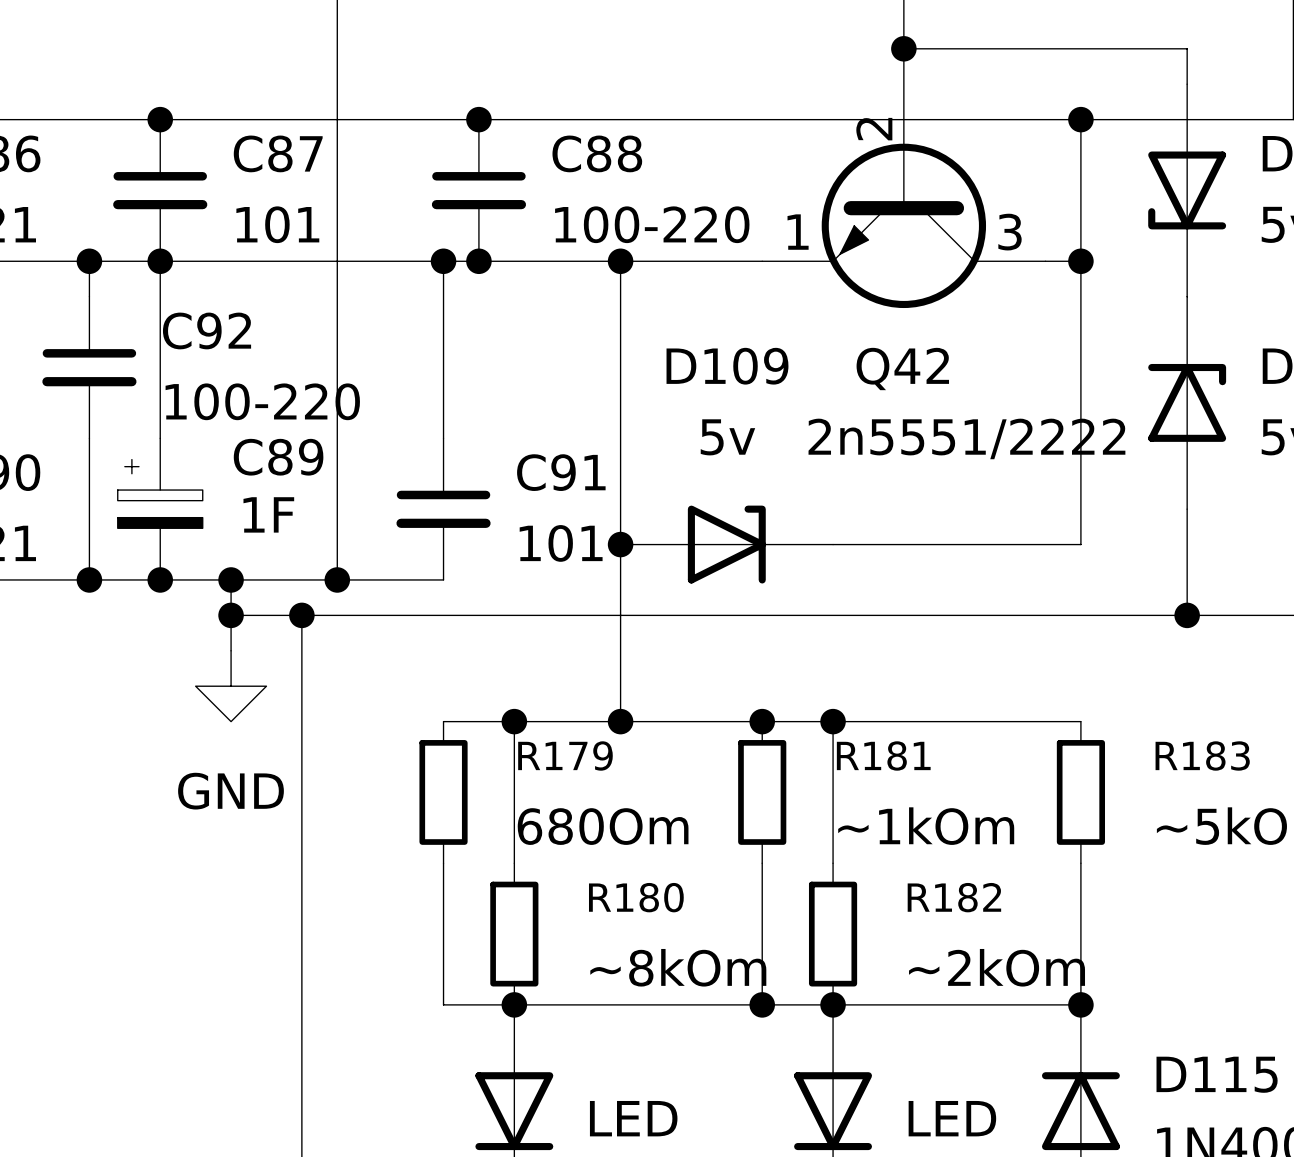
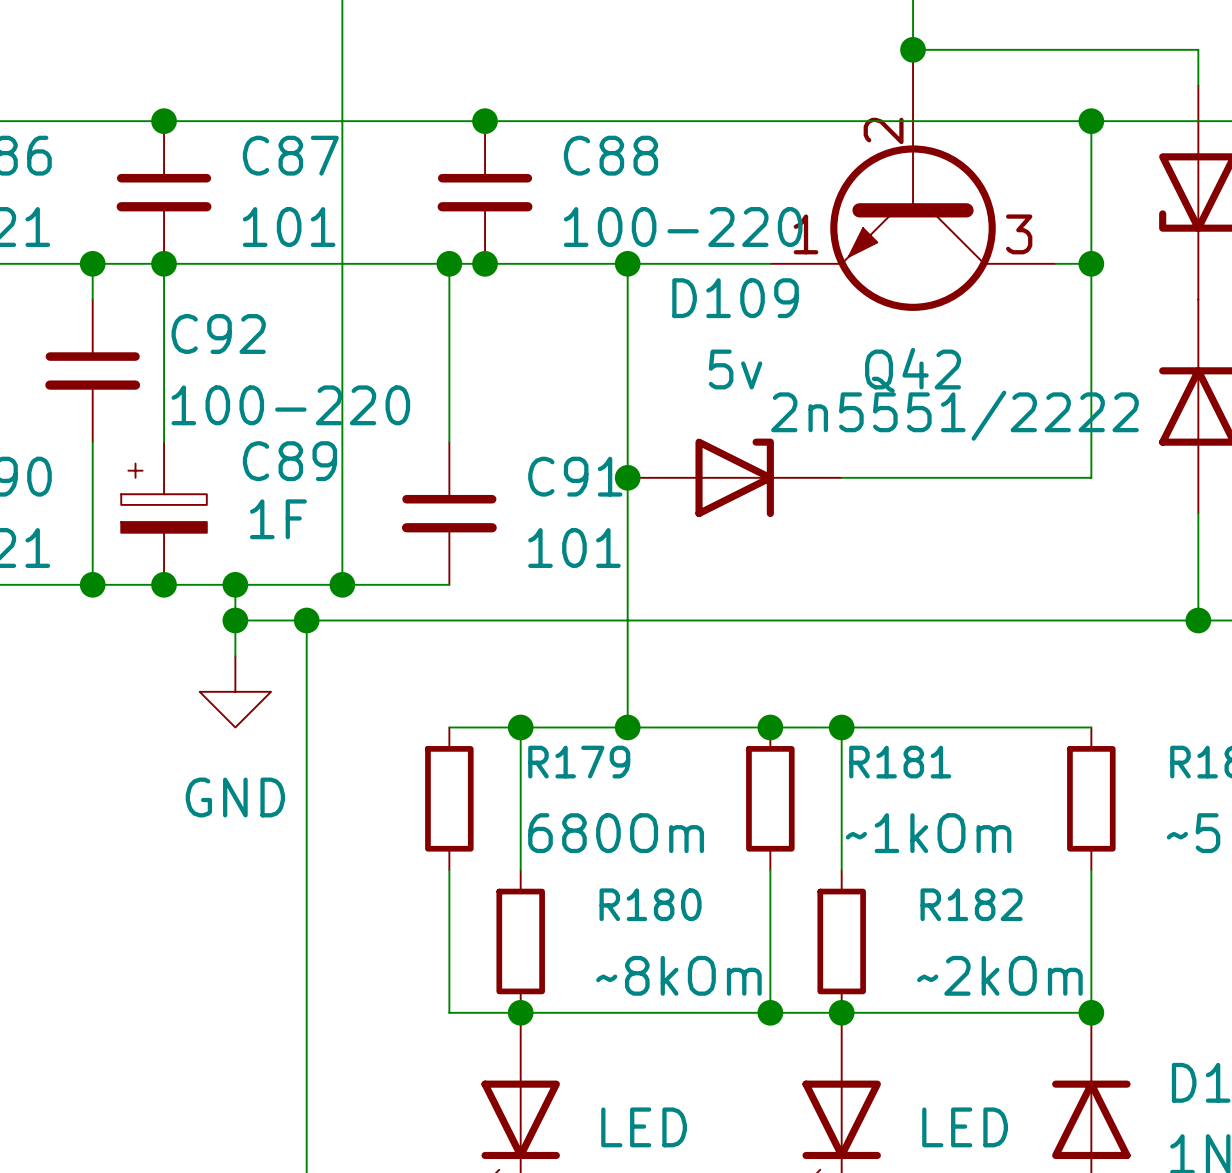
Q42 value position: 2n5551/2222 (966, 438) -> 2n5551/2222 (954, 415)
wire: (1080, 473) (1080, 544) (833, 544) -> (1091, 477) (841, 477)
junction position: (620, 544) -> (627, 477)
D109 position: (726, 544) -> (734, 477)

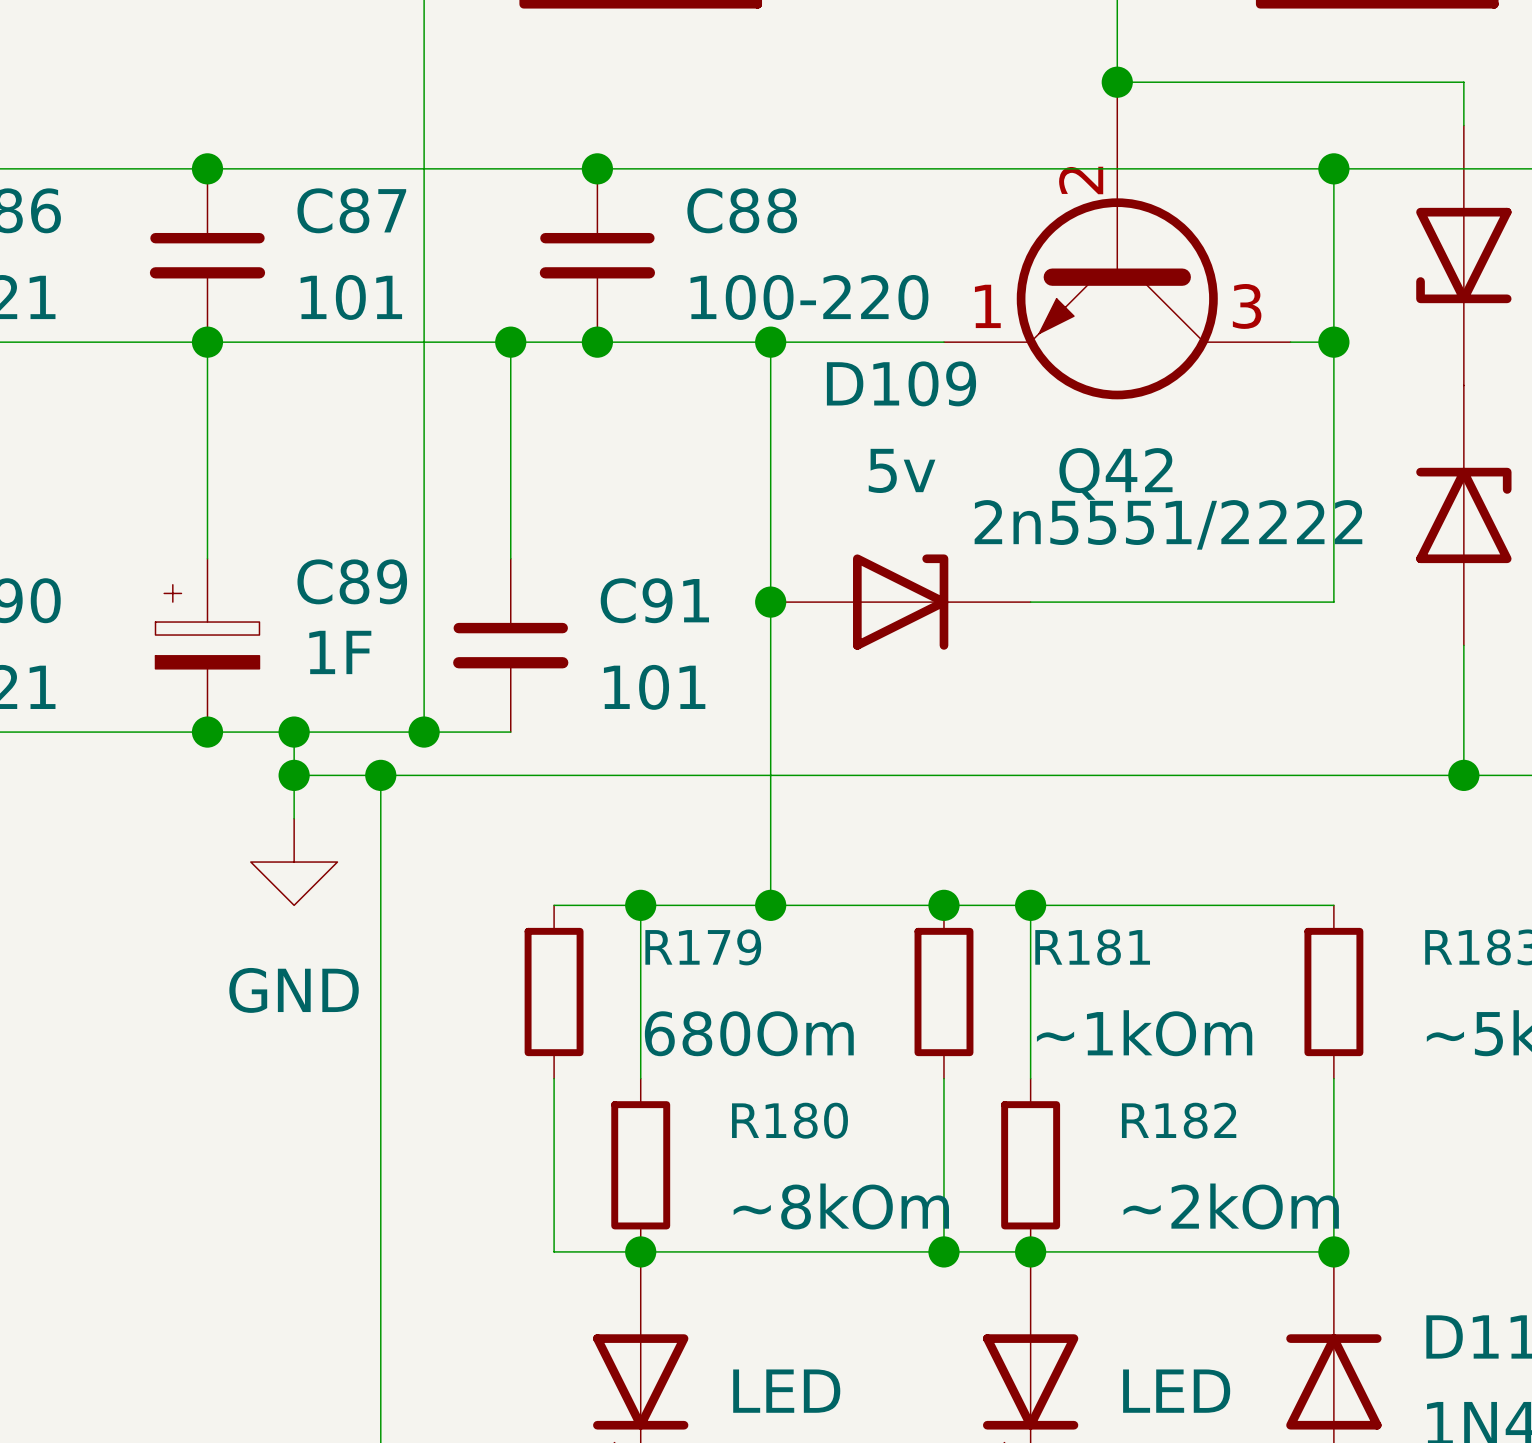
wire: (92, 263) (92, 299) -> none
junction: (92, 263) -> none
wire: (449, 263) (449, 442) -> (510, 342) (510, 558)
junction position: (449, 263) -> (510, 342)
C92: 100-220 (92, 370) -> none
wire: (92, 442) (92, 584) -> none
C91 position: (449, 513) -> (510, 645)
junction: (92, 584) -> none
wire: (413, 584) (449, 584) -> none

